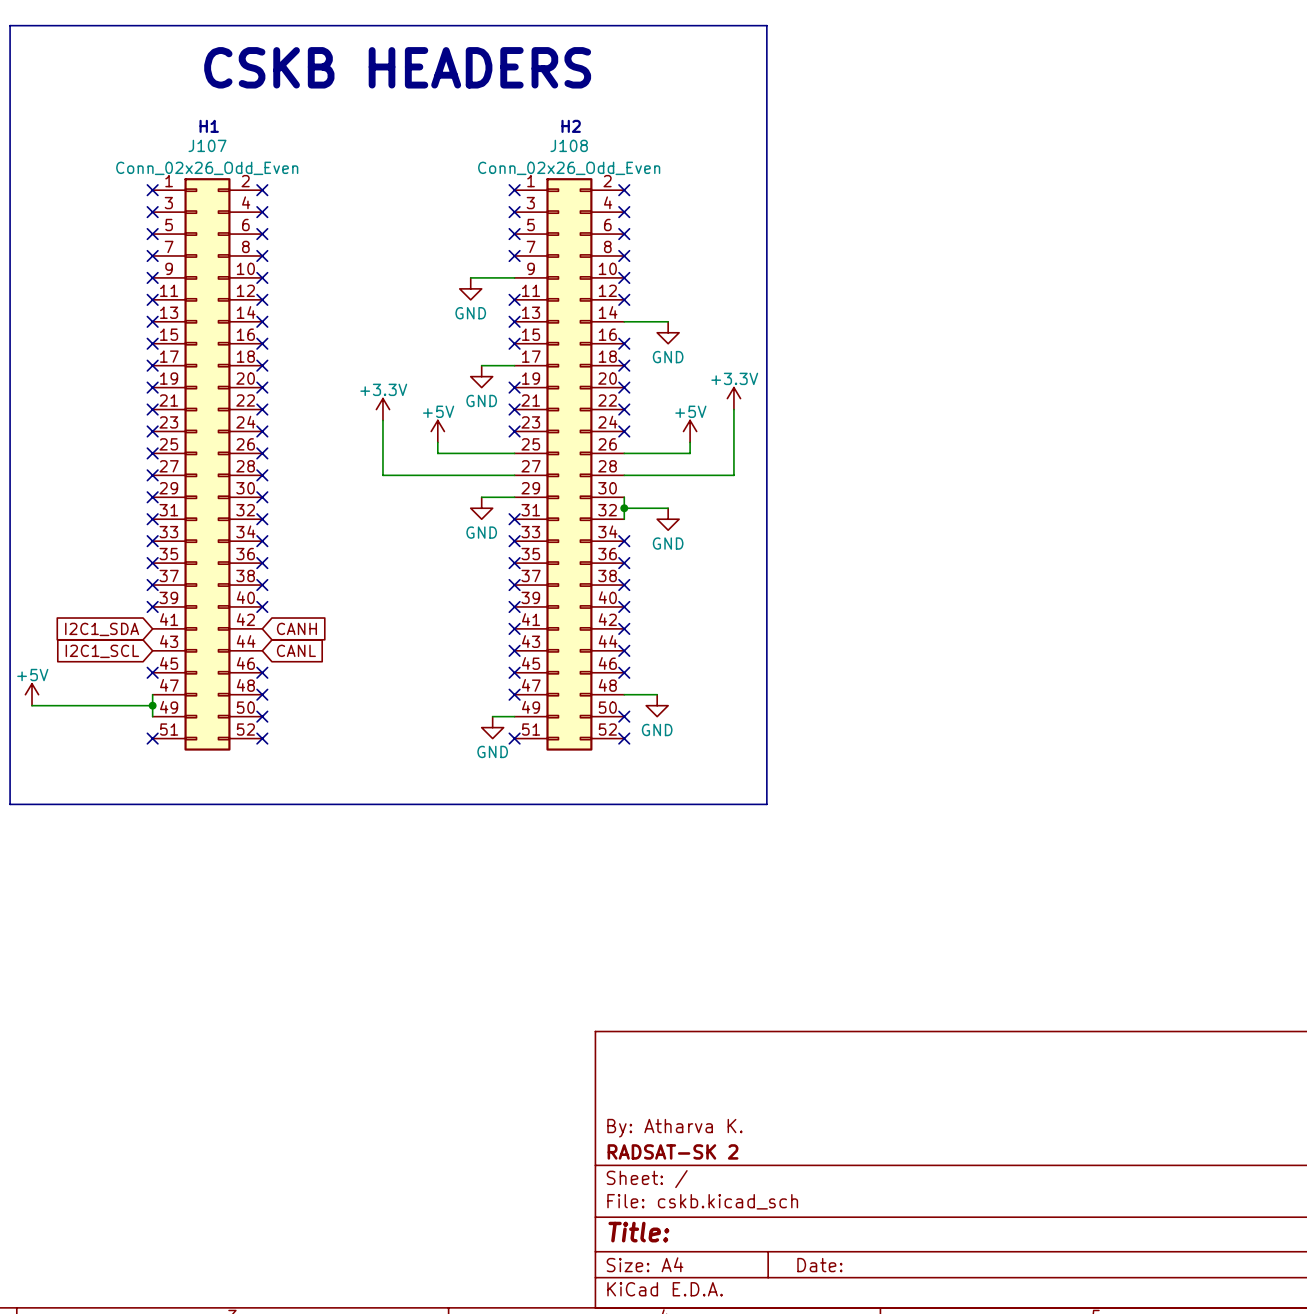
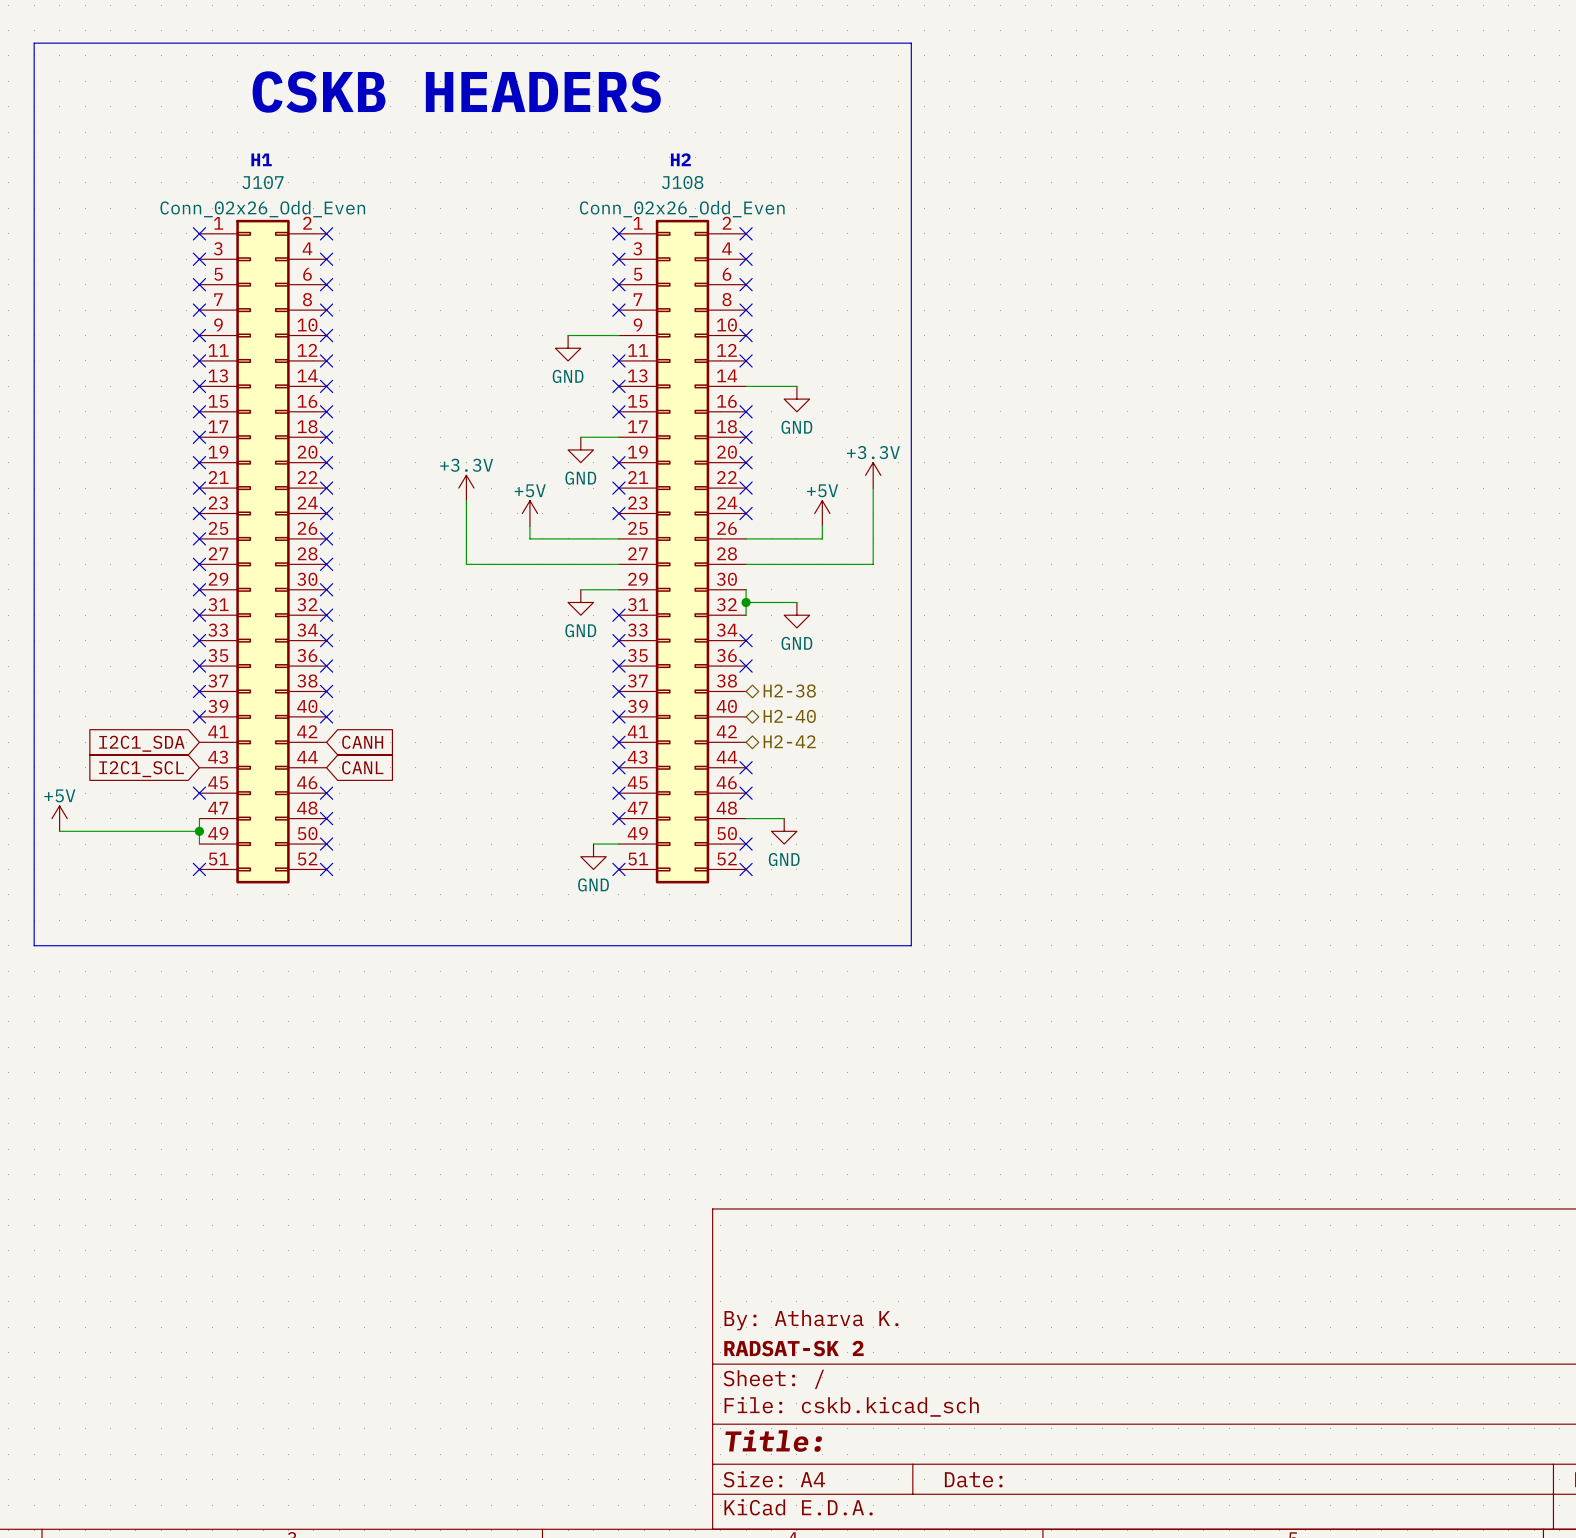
hierarchical label: none -> H2-38 (789, 691)
no-connect mark: (624, 585) -> none
no-connect mark: (624, 606) -> none
hierarchical label: none -> H2-40 (789, 716)
no-connect mark: (624, 628) -> none
hierarchical label: none -> H2-42 (789, 741)

